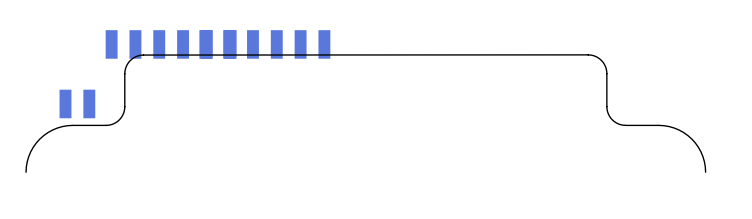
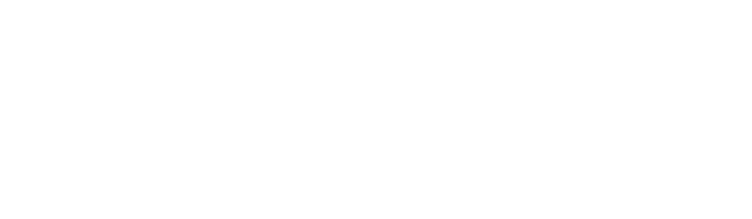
part: (171, 44) -> none
part: (264, 44) -> none
drawing: [25, 54, 706, 173] -> none
part: (77, 103) -> none

